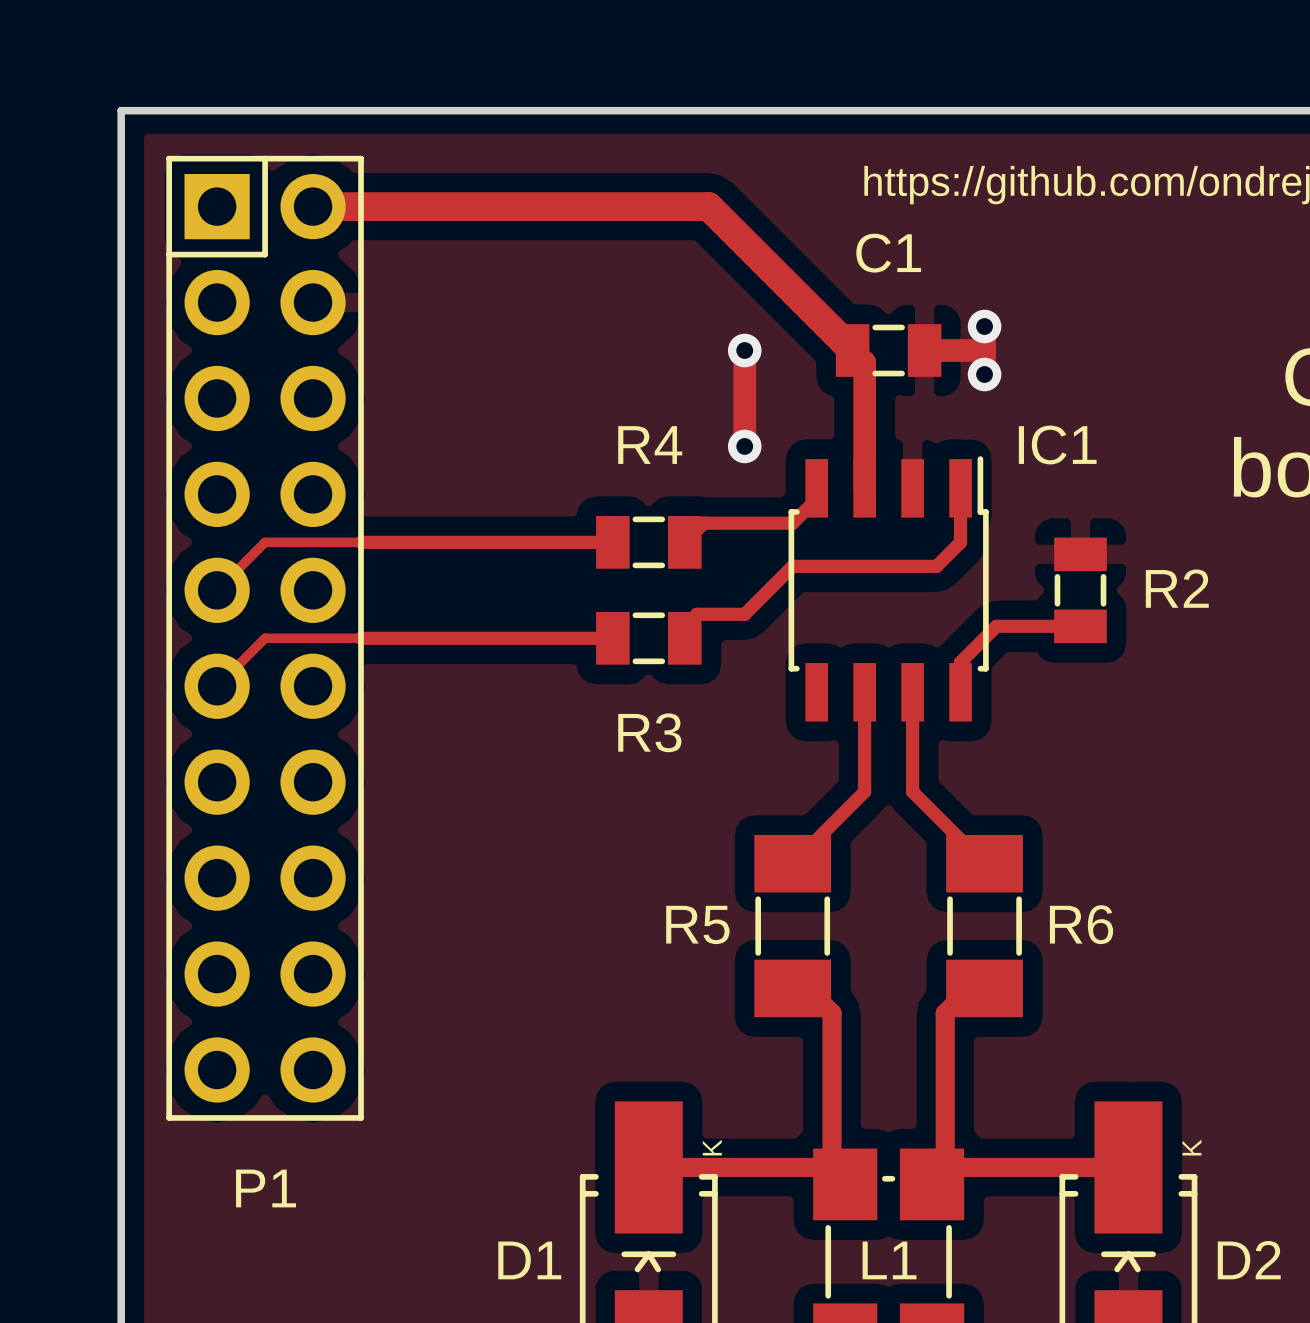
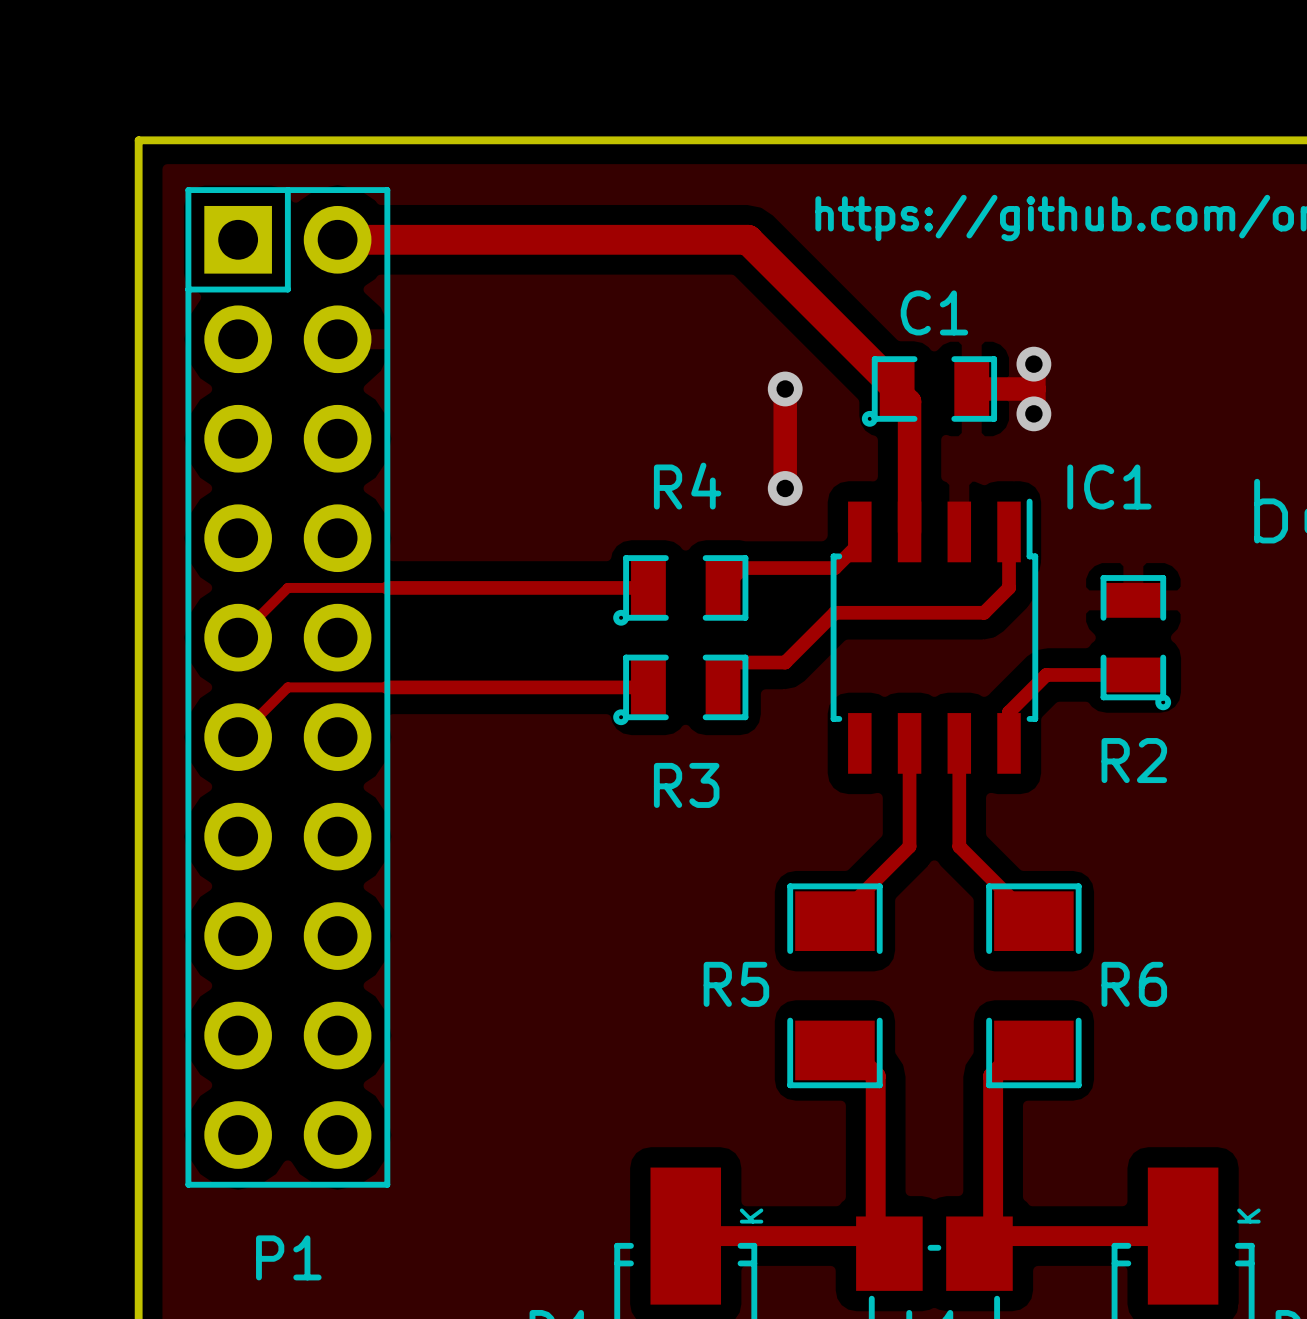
C1 footprint: [835, 324, 942, 377] -> [861, 356, 998, 427]
R4 footprint: [596, 515, 702, 569] -> [613, 555, 749, 626]
R2 footprint: [1054, 537, 1107, 644] -> [1100, 575, 1172, 711]
R2 name position: R2 (1177, 588) -> R2 (1134, 760)
R3 footprint: [596, 611, 702, 665] -> [613, 654, 749, 726]
R5 footprint: [754, 834, 832, 1018] -> [787, 883, 883, 1089]
R6 footprint: [946, 834, 1023, 1018] -> [986, 883, 1082, 1089]

